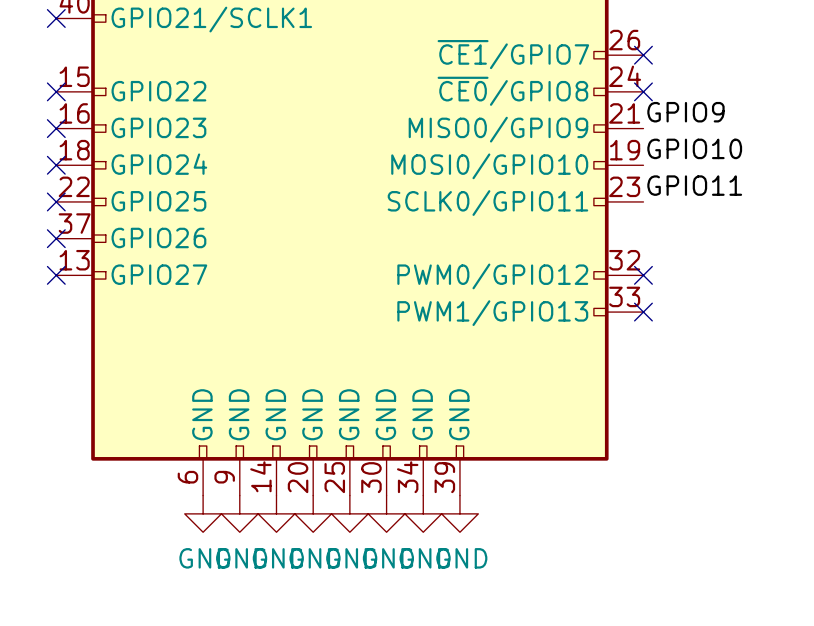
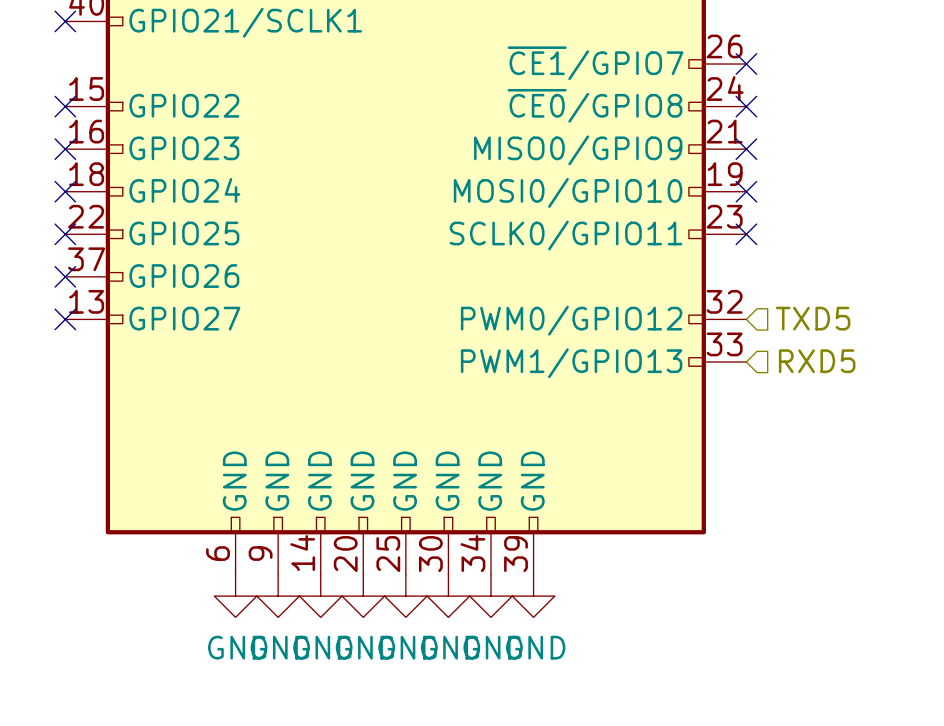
label: GPIO9 (685, 112) -> none
no-connect mark: none -> (746, 149)
label: GPIO10 (694, 148) -> none
no-connect mark: none -> (746, 191)
label: GPIO11 (694, 185) -> none
no-connect mark: none -> (746, 234)
hierarchical label: none -> TXD5 (813, 318)
no-connect mark: (643, 275) -> none
hierarchical label: none -> RXD5 (817, 361)
no-connect mark: (643, 312) -> none

